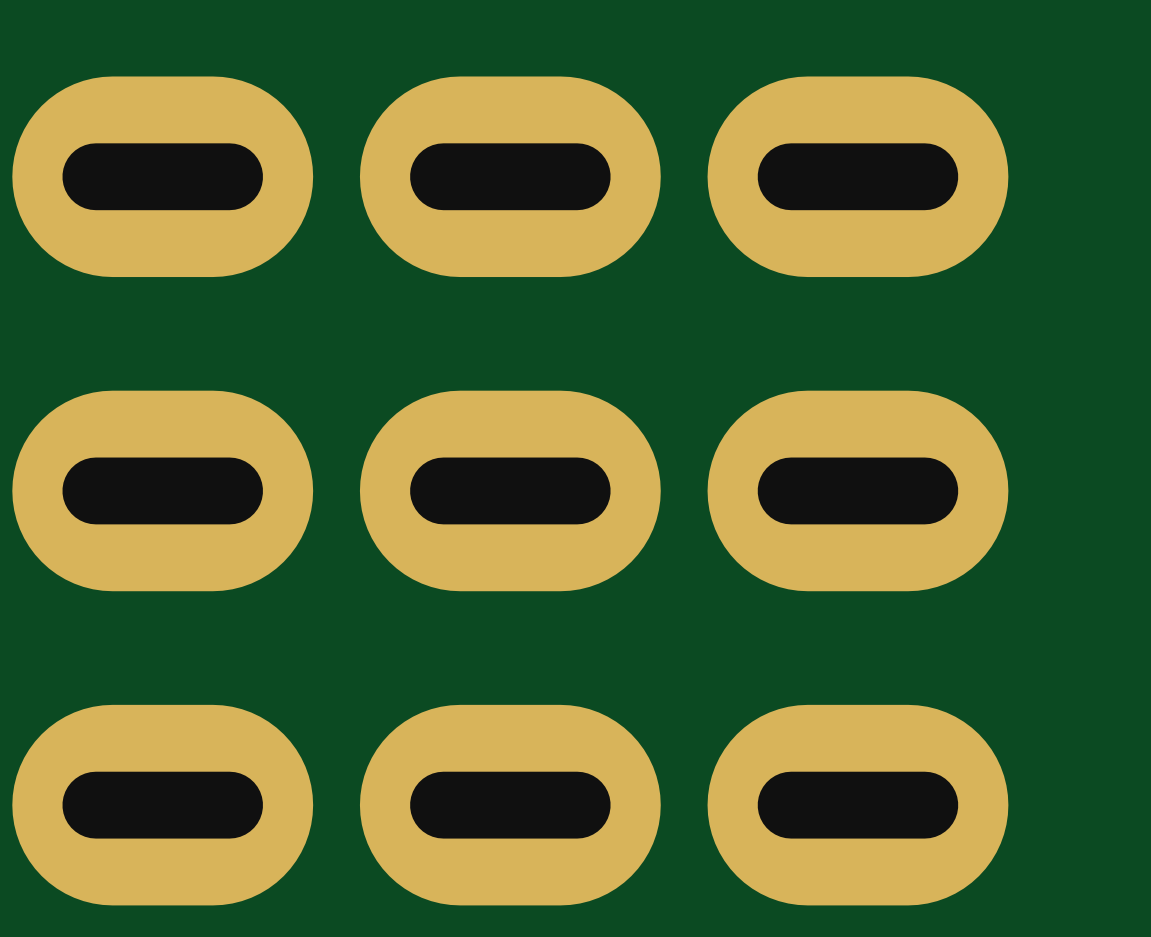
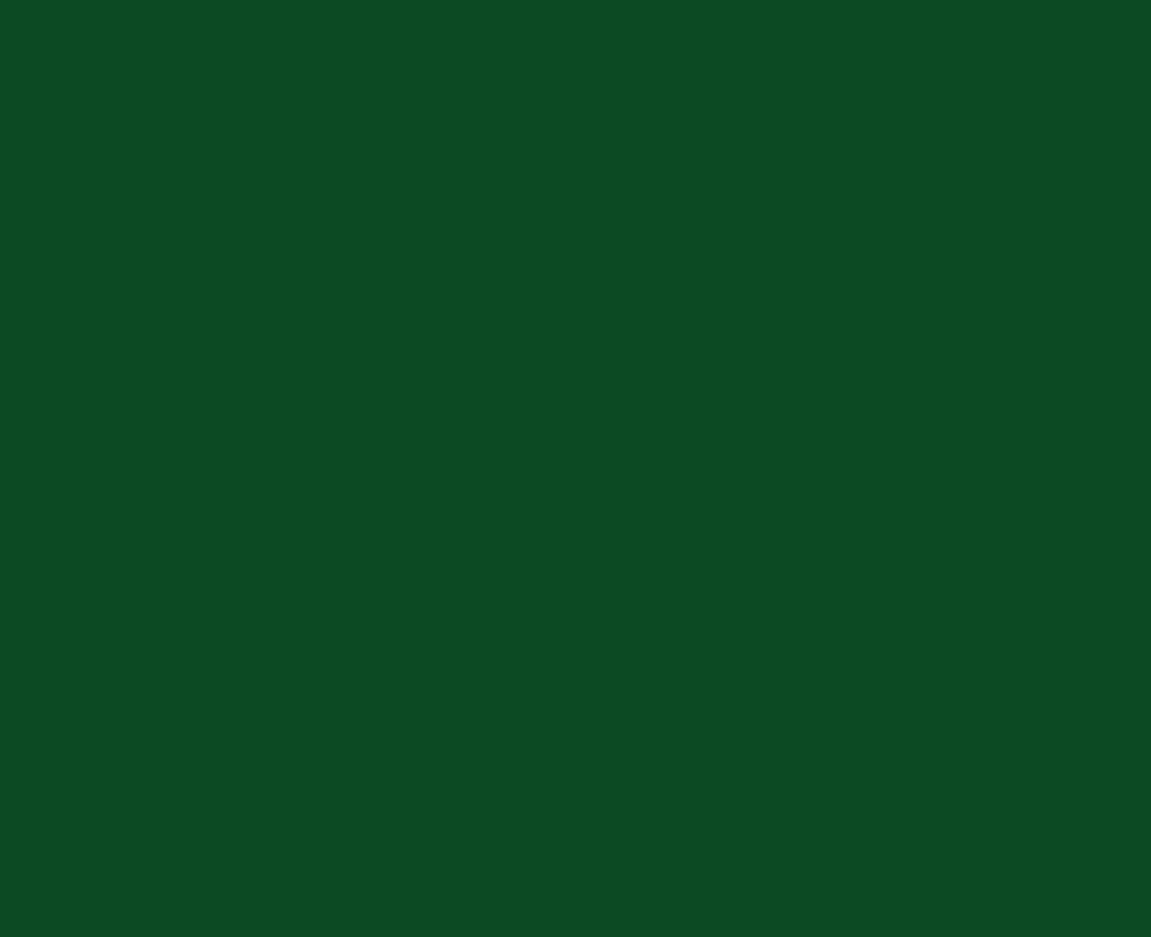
part: (510, 490) -> none

